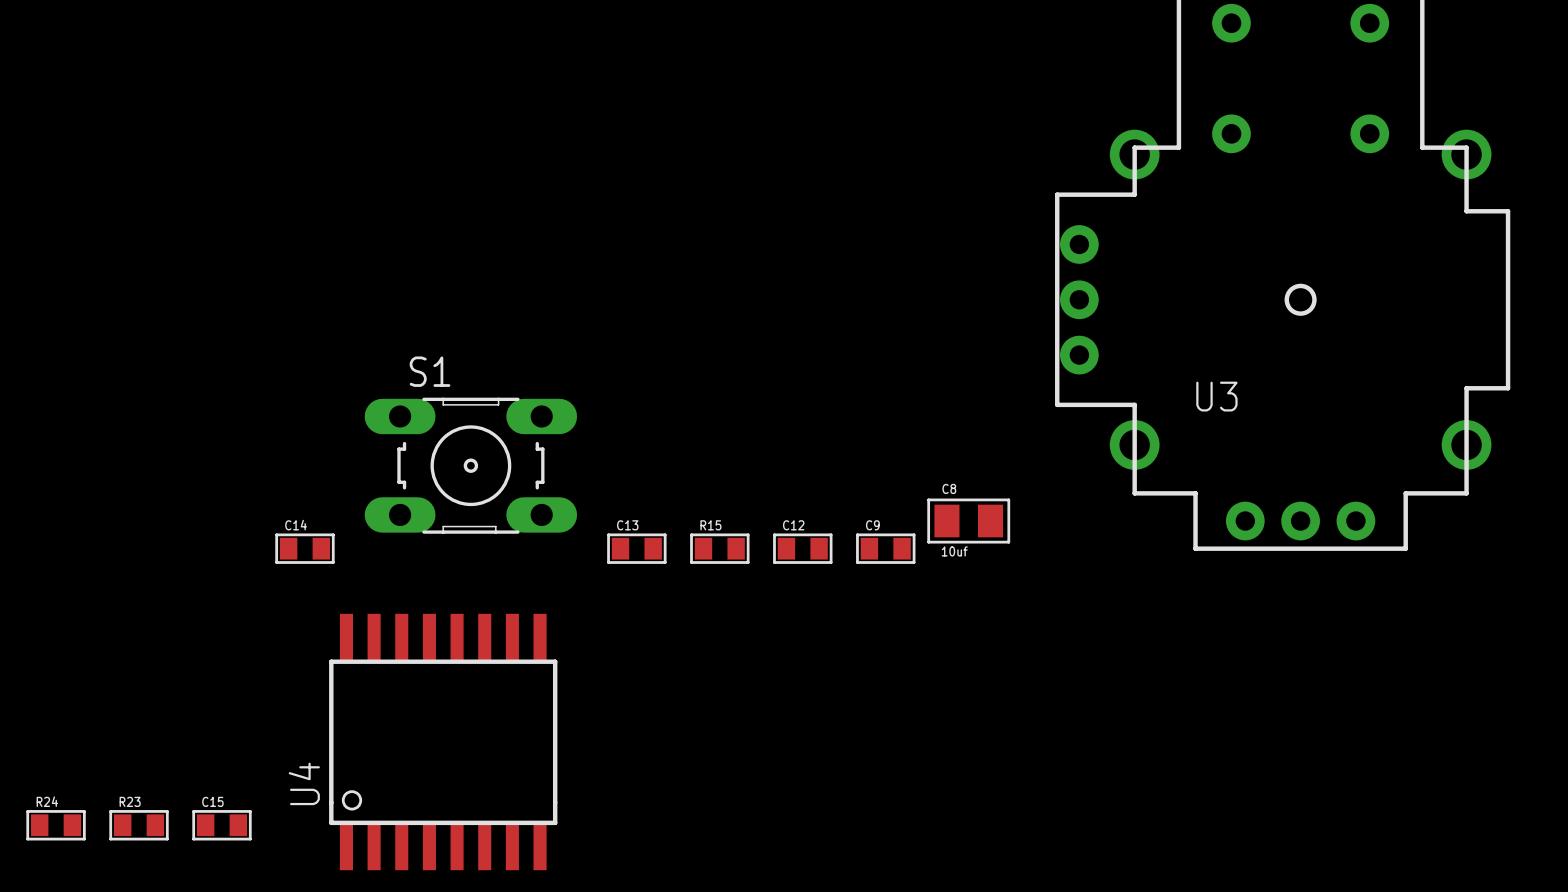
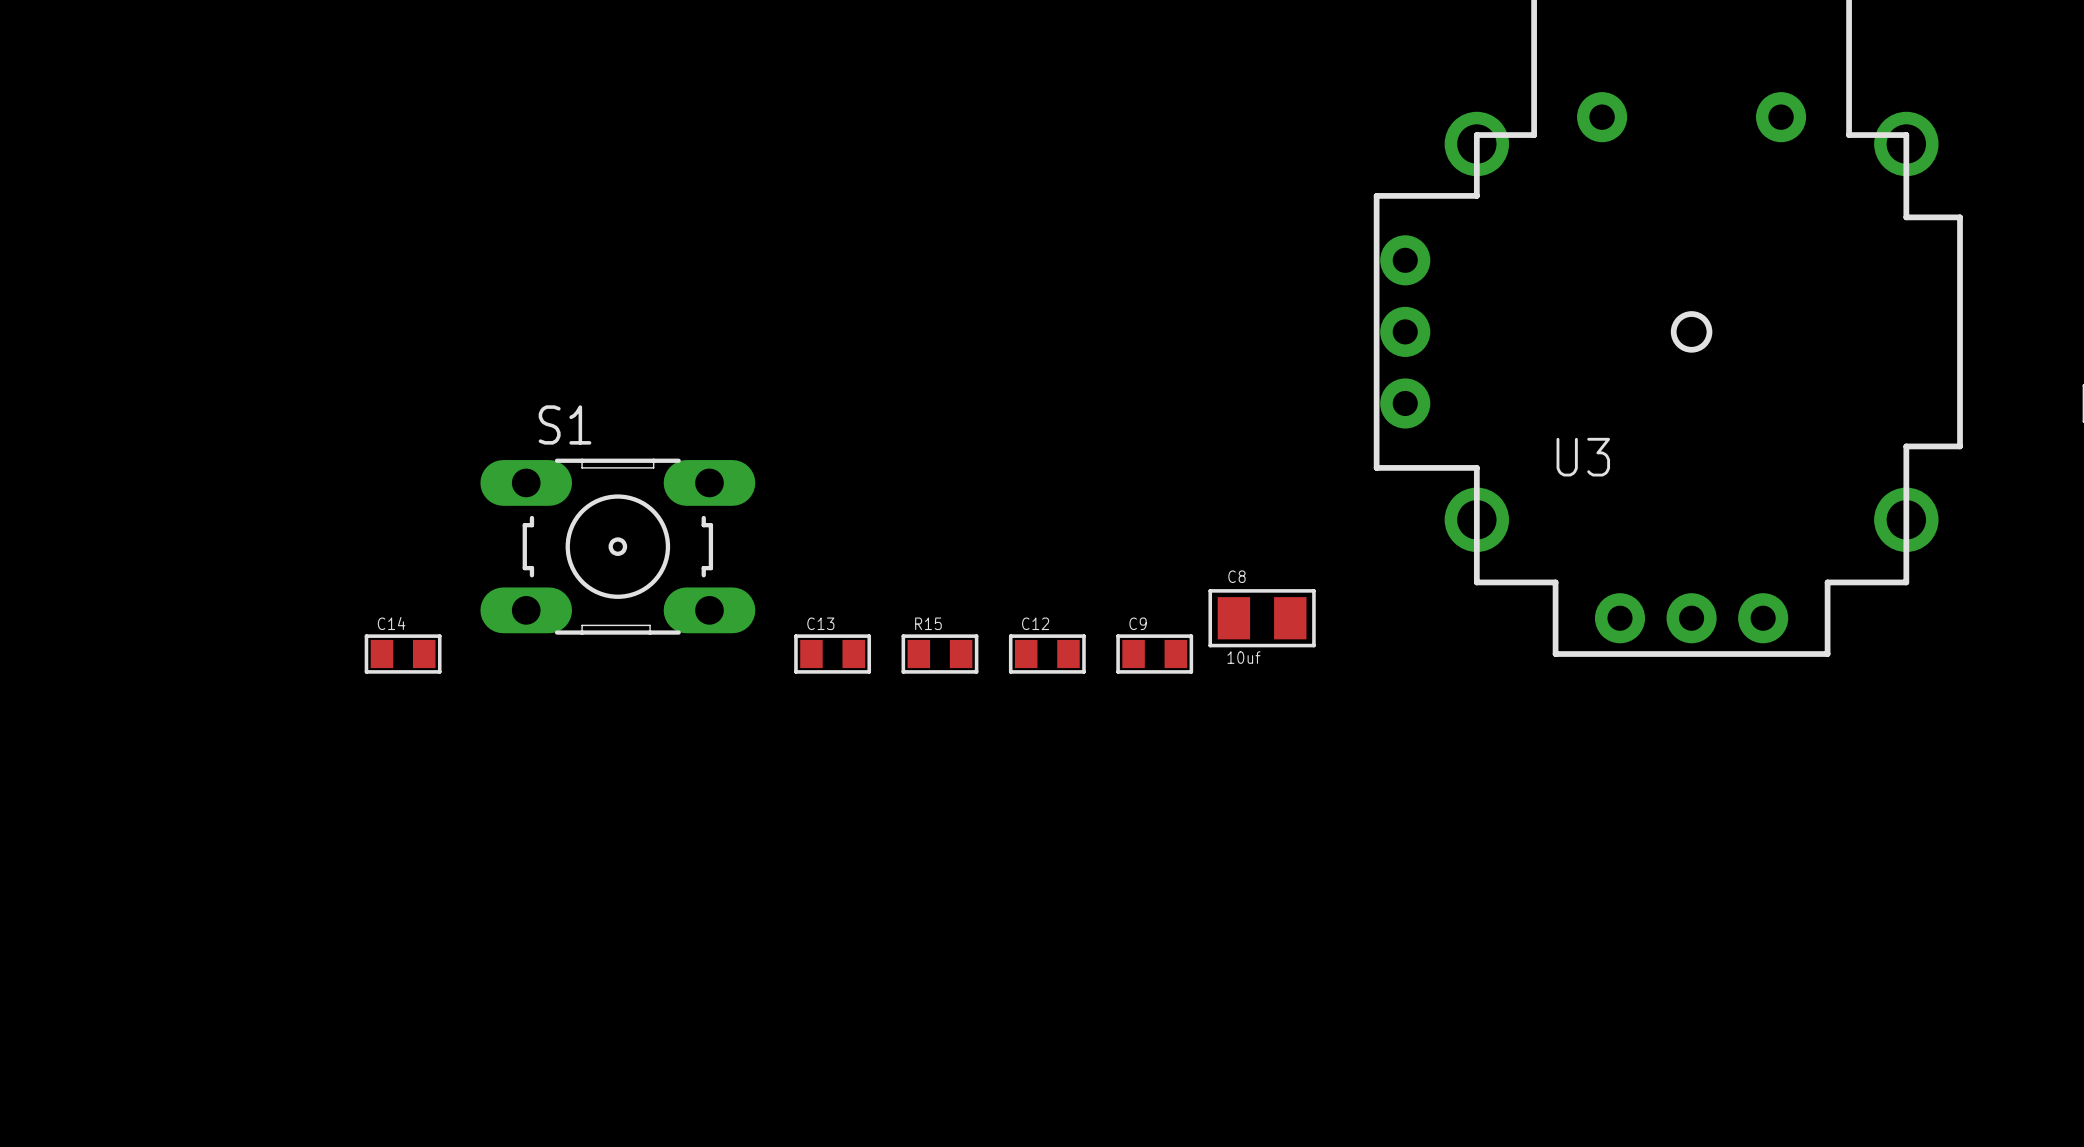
U4: (443, 742) -> none
R24: (56, 825) -> none
R23: (139, 825) -> none
C15: (221, 825) -> none

